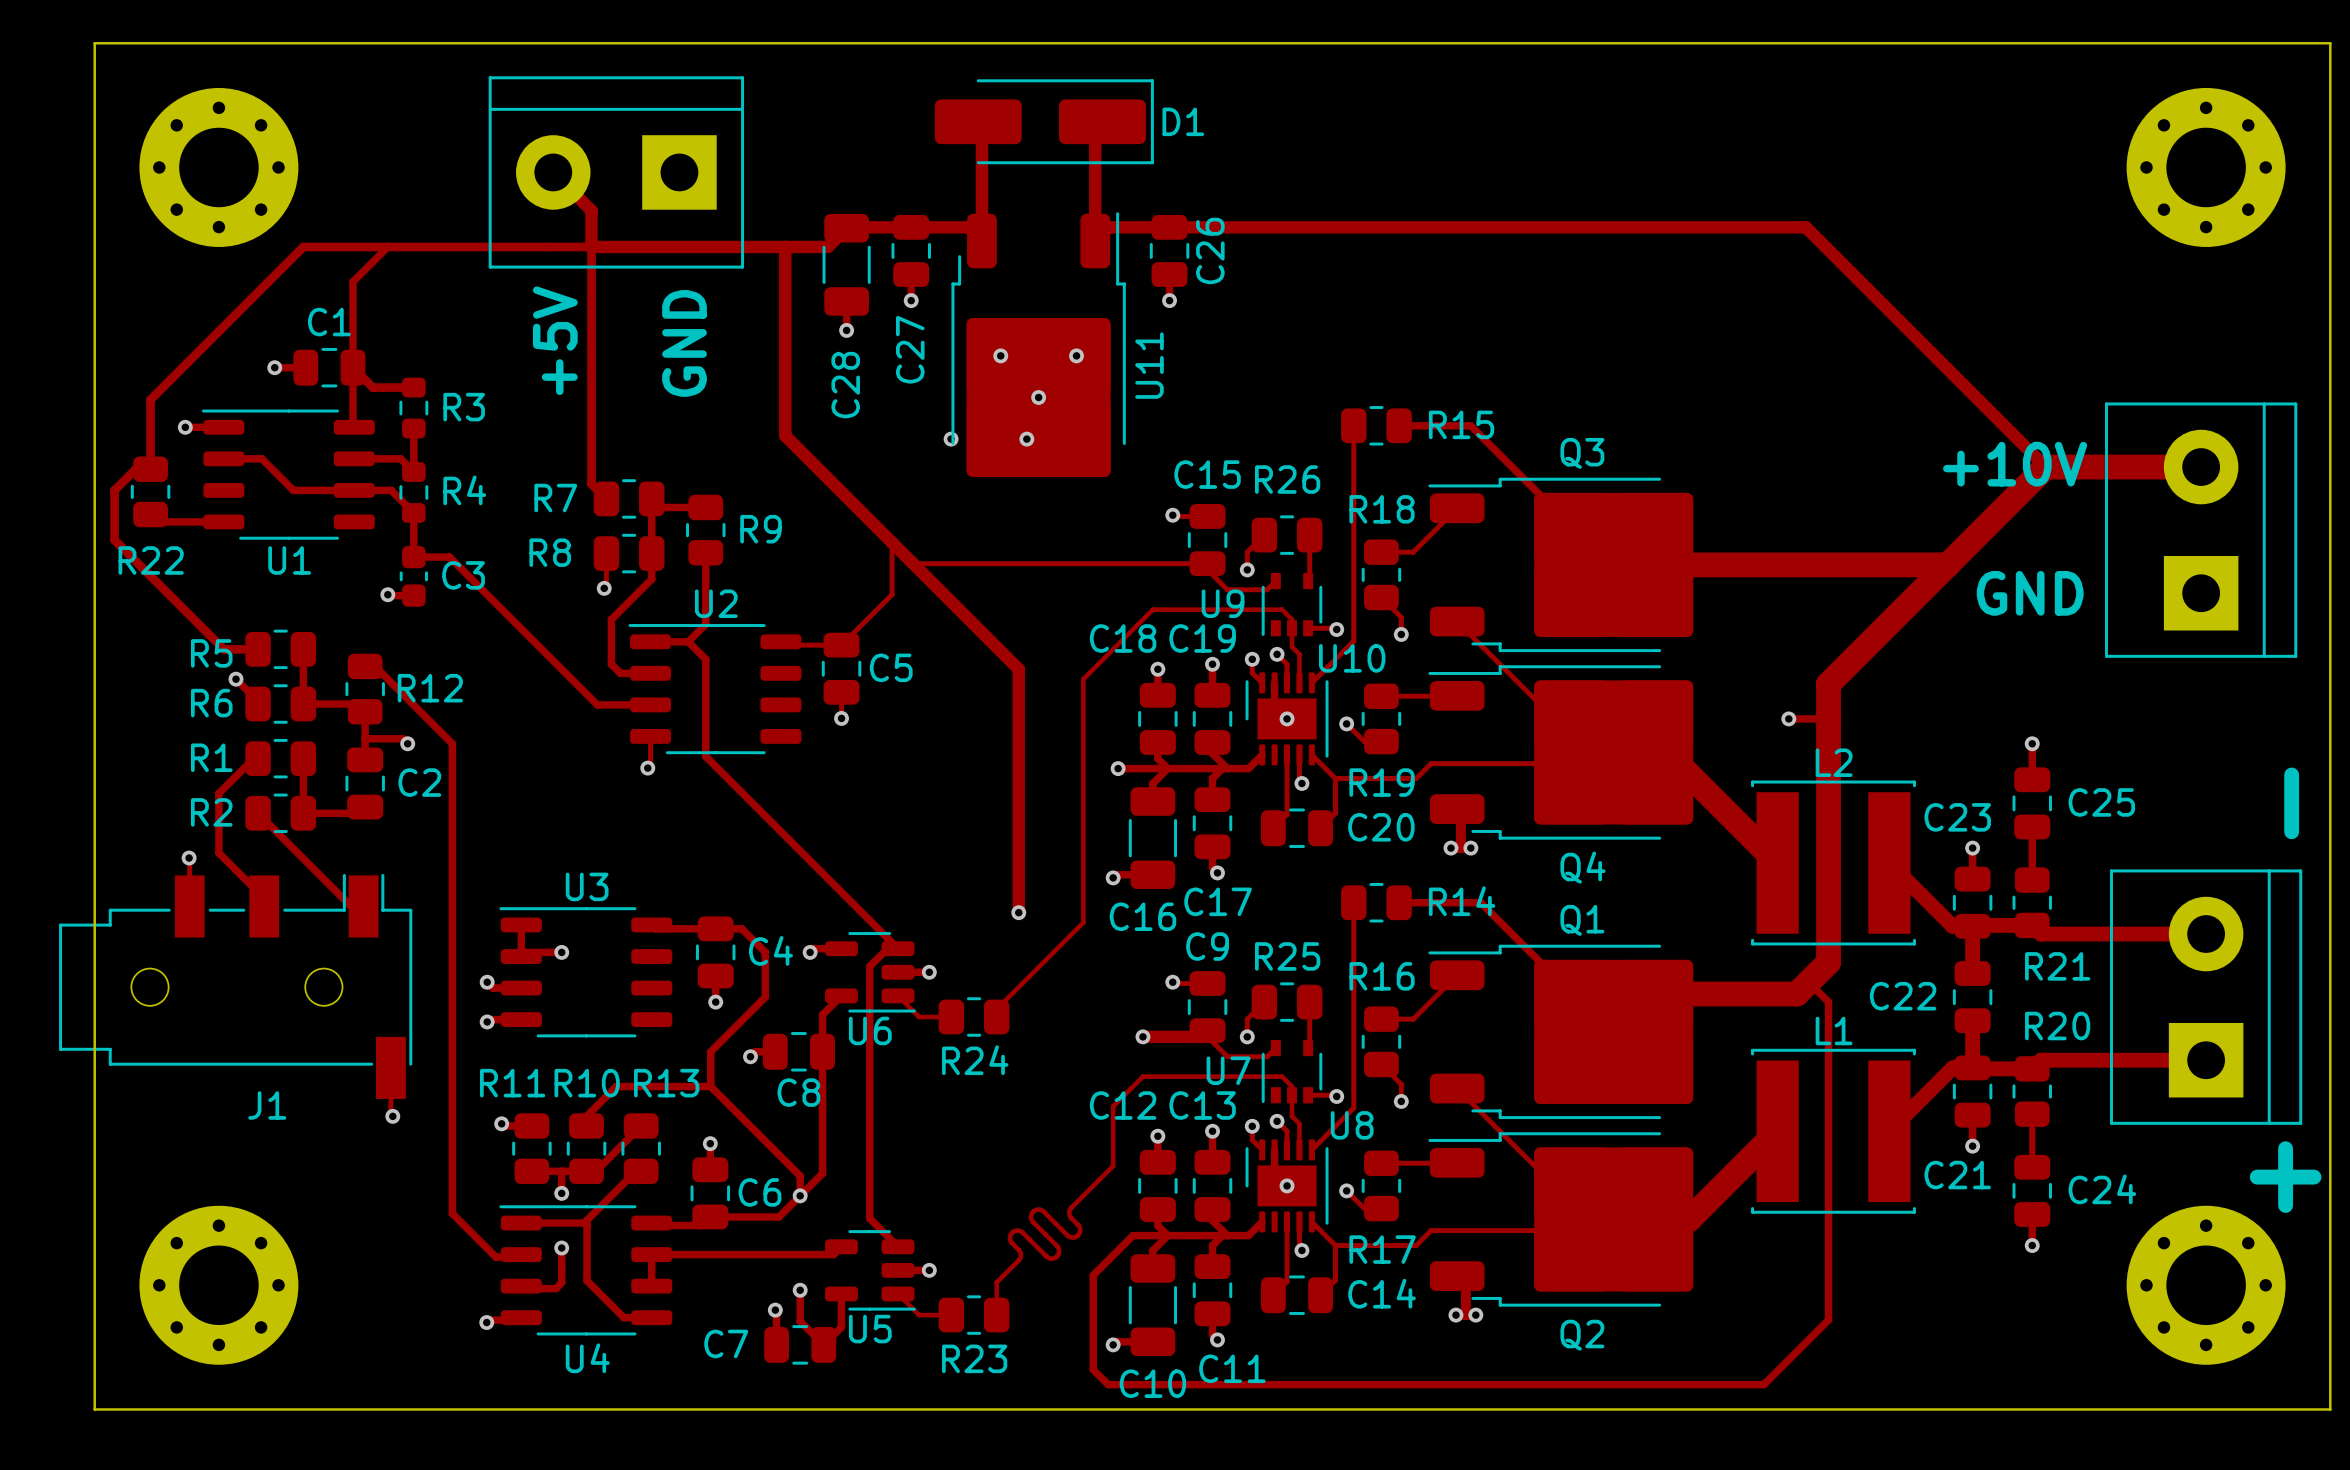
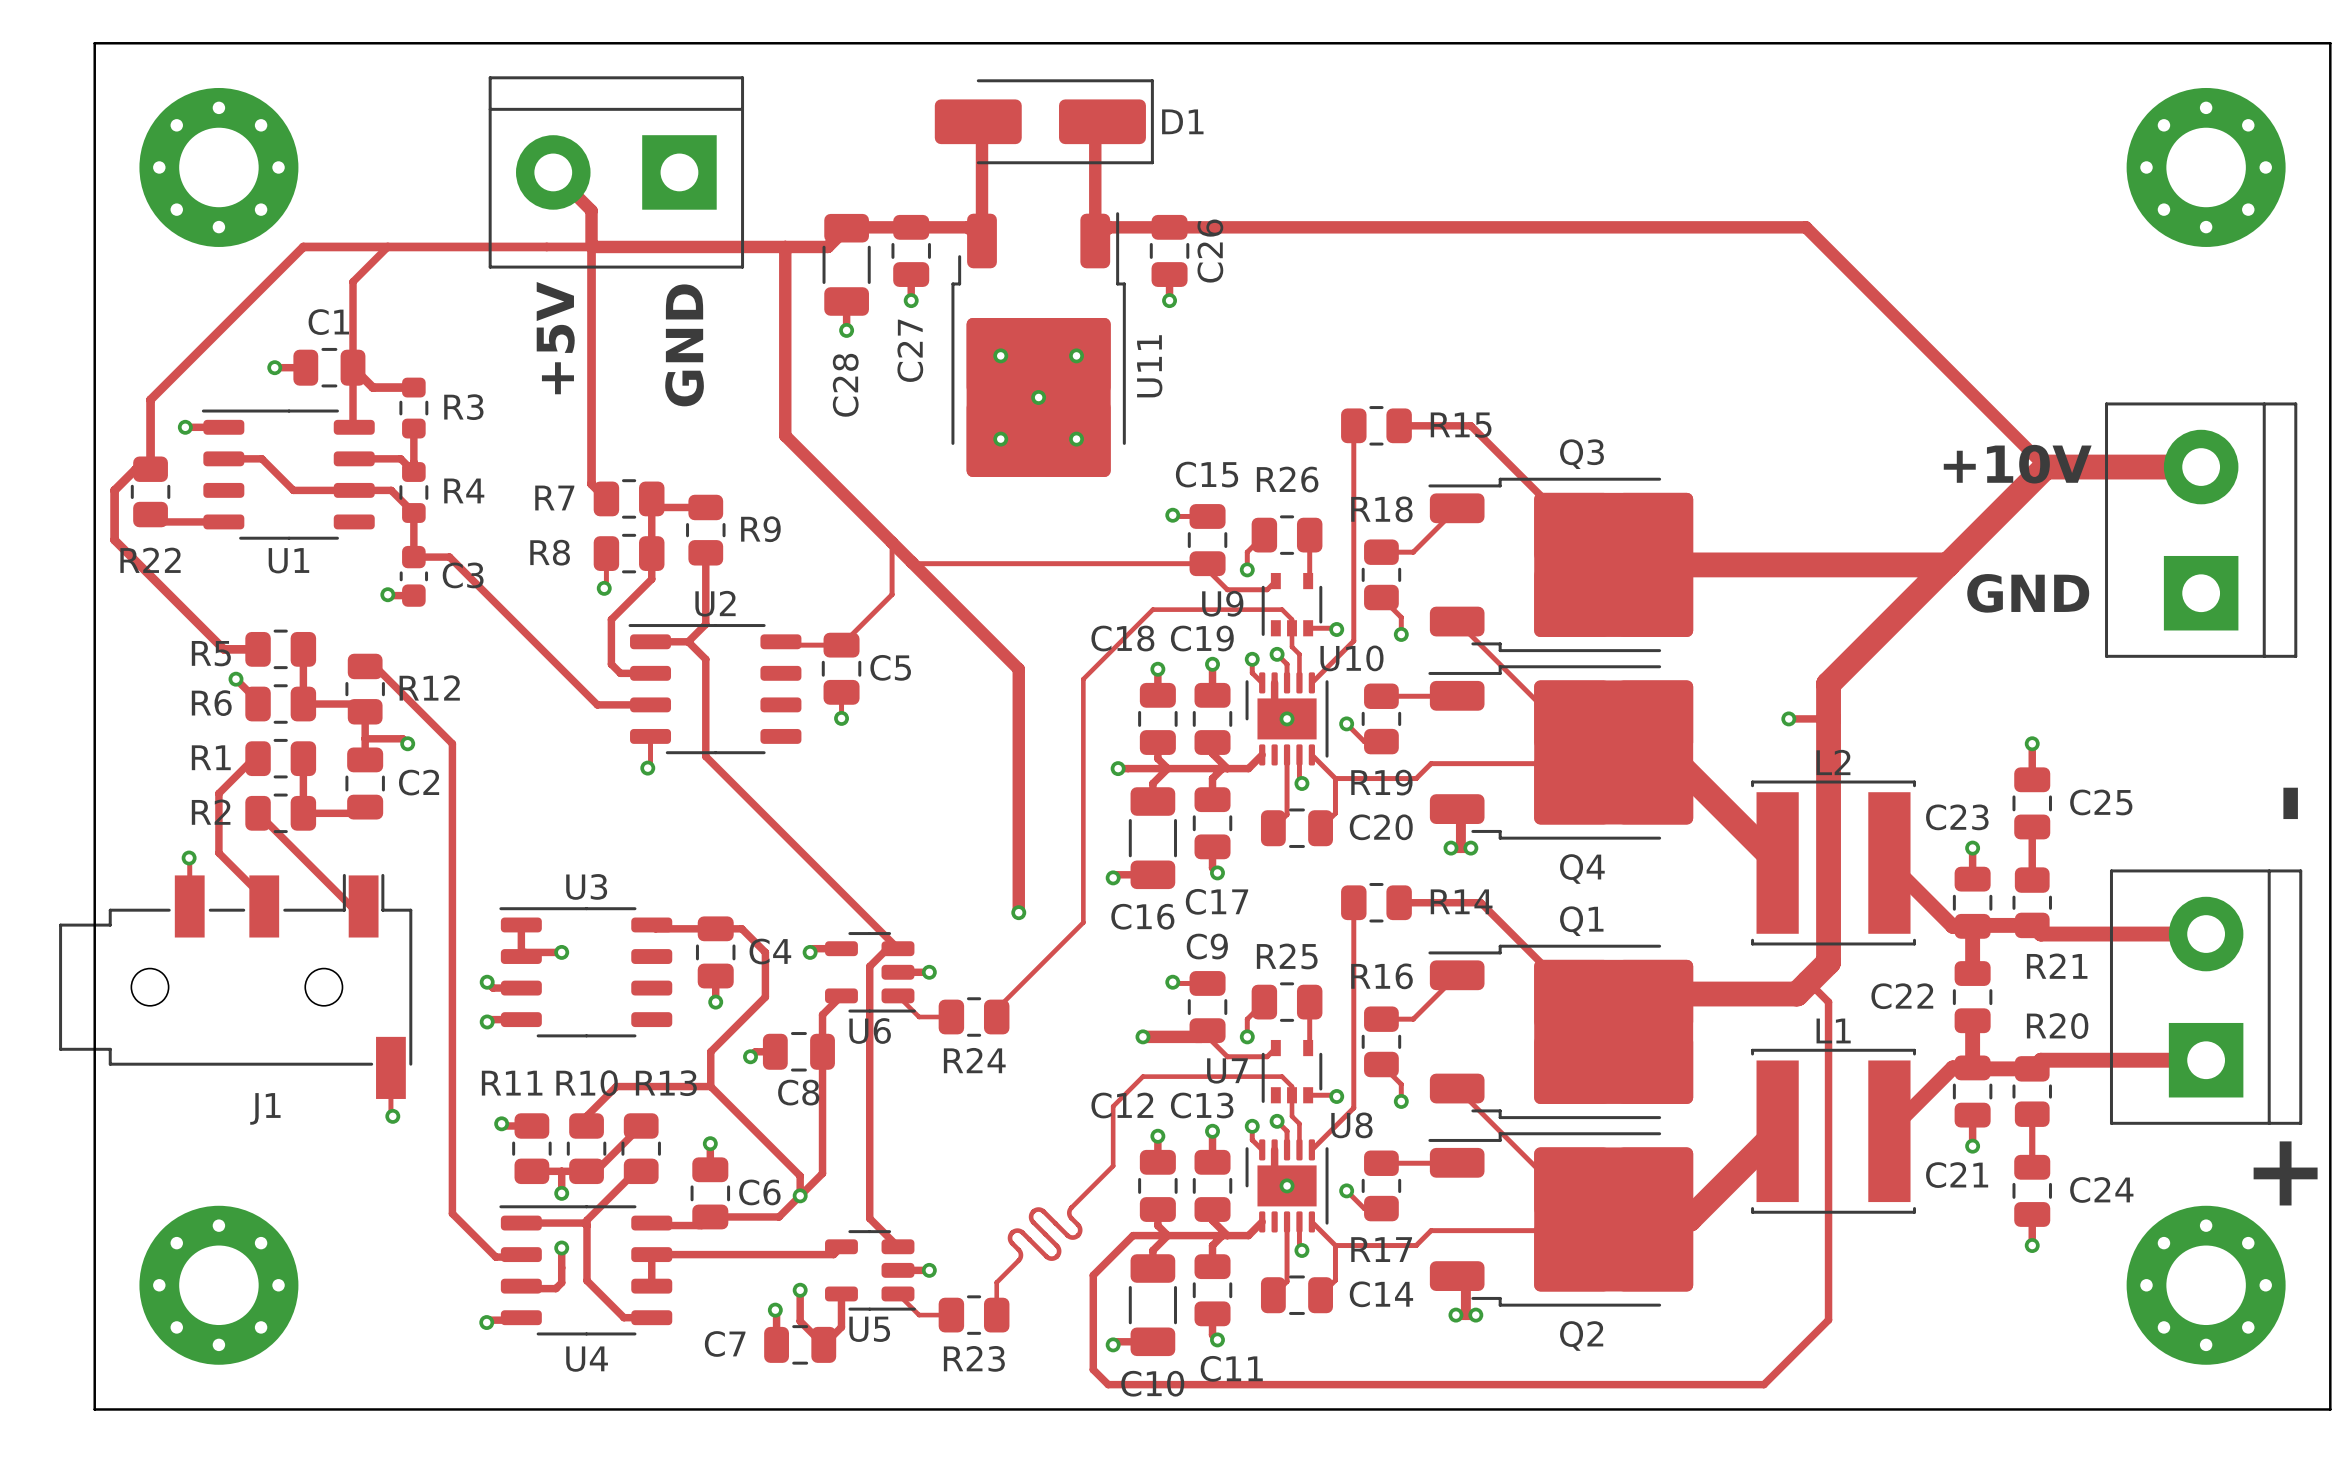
via: (951, 439) -> none
via: none -> (1000, 439)
via: (1026, 439) -> none
via: none -> (1076, 439)

